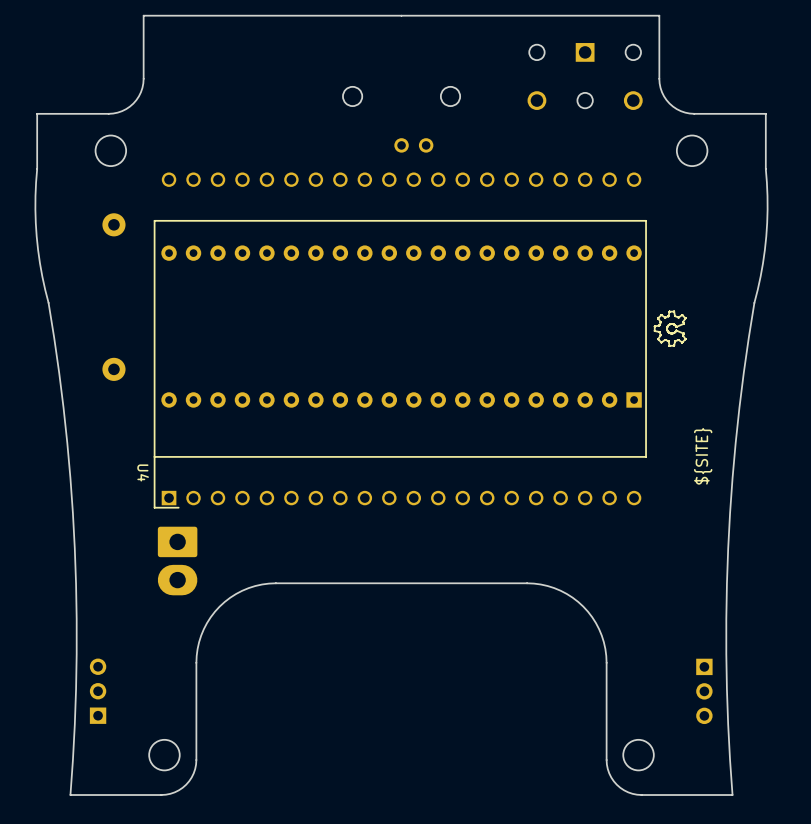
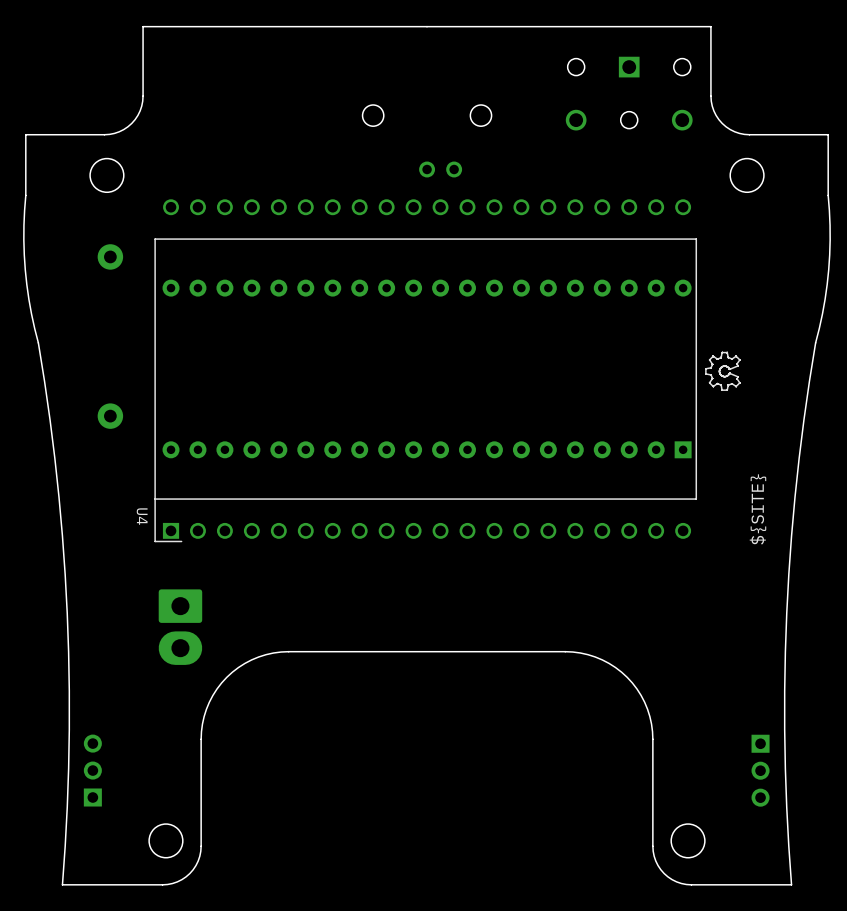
U4 footprint: [154, 172, 647, 509] -> [154, 199, 697, 543]

